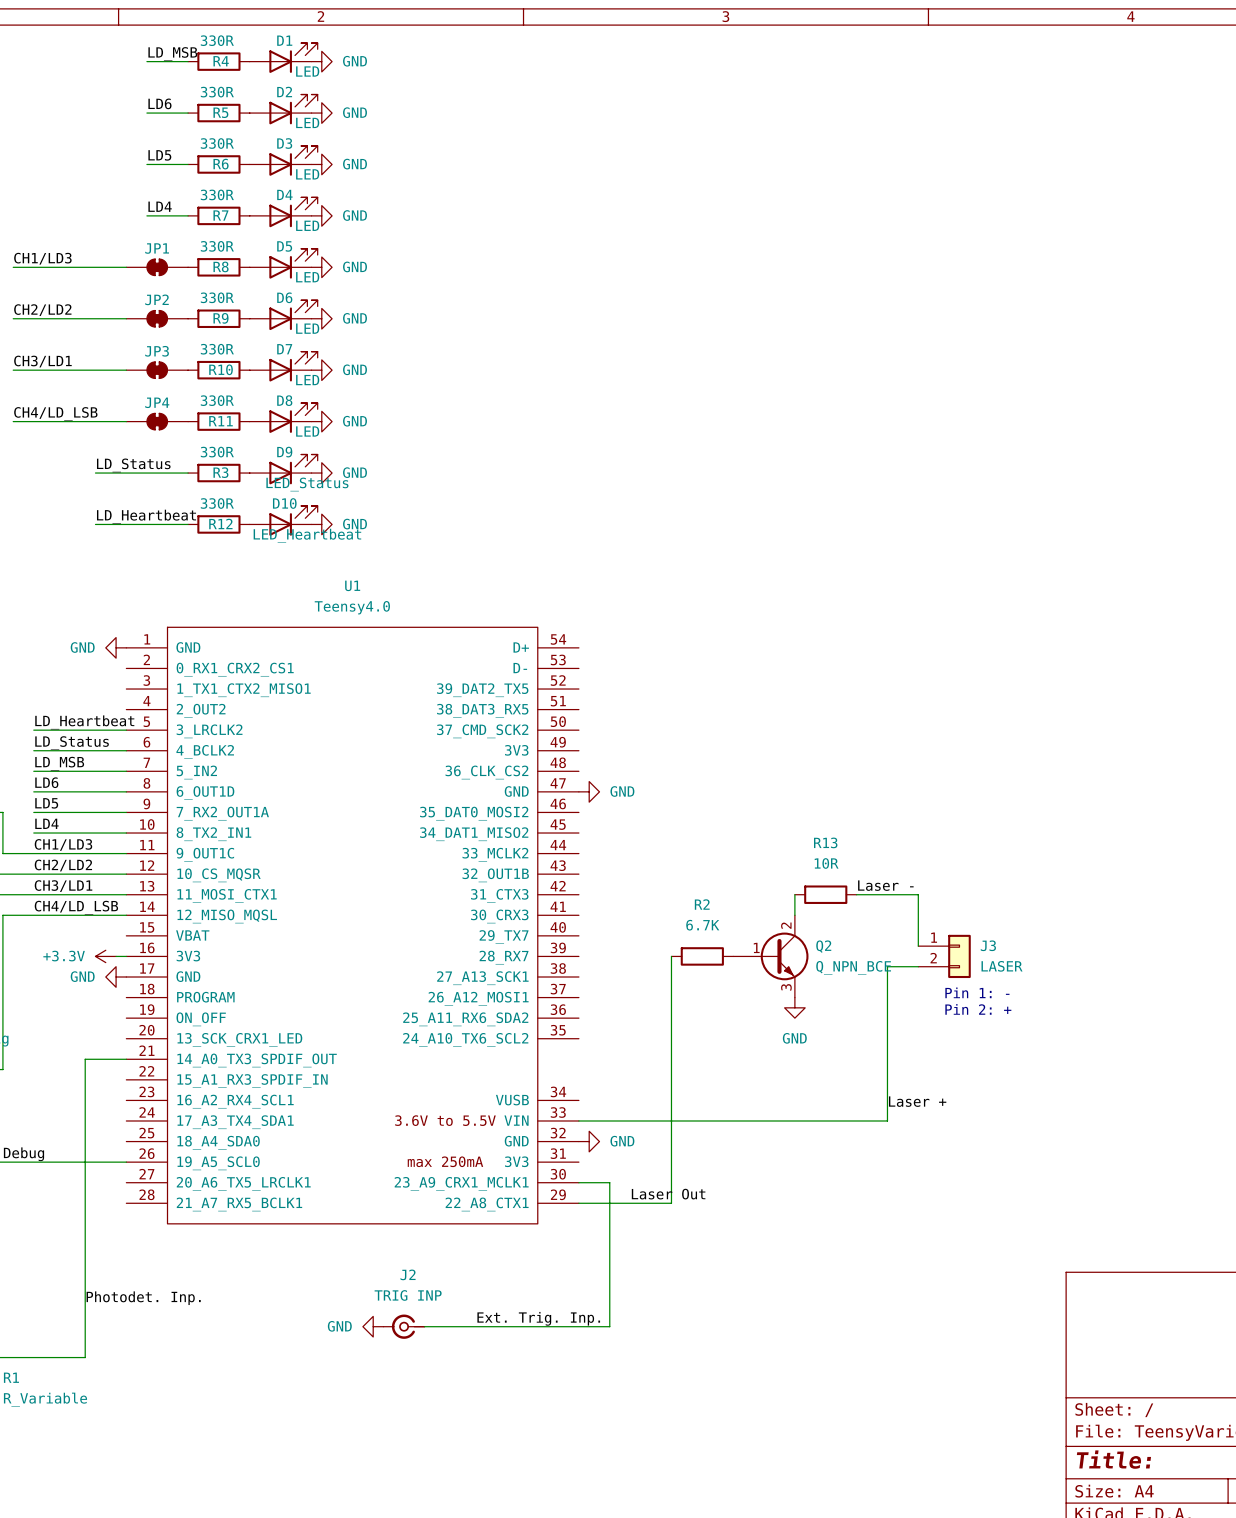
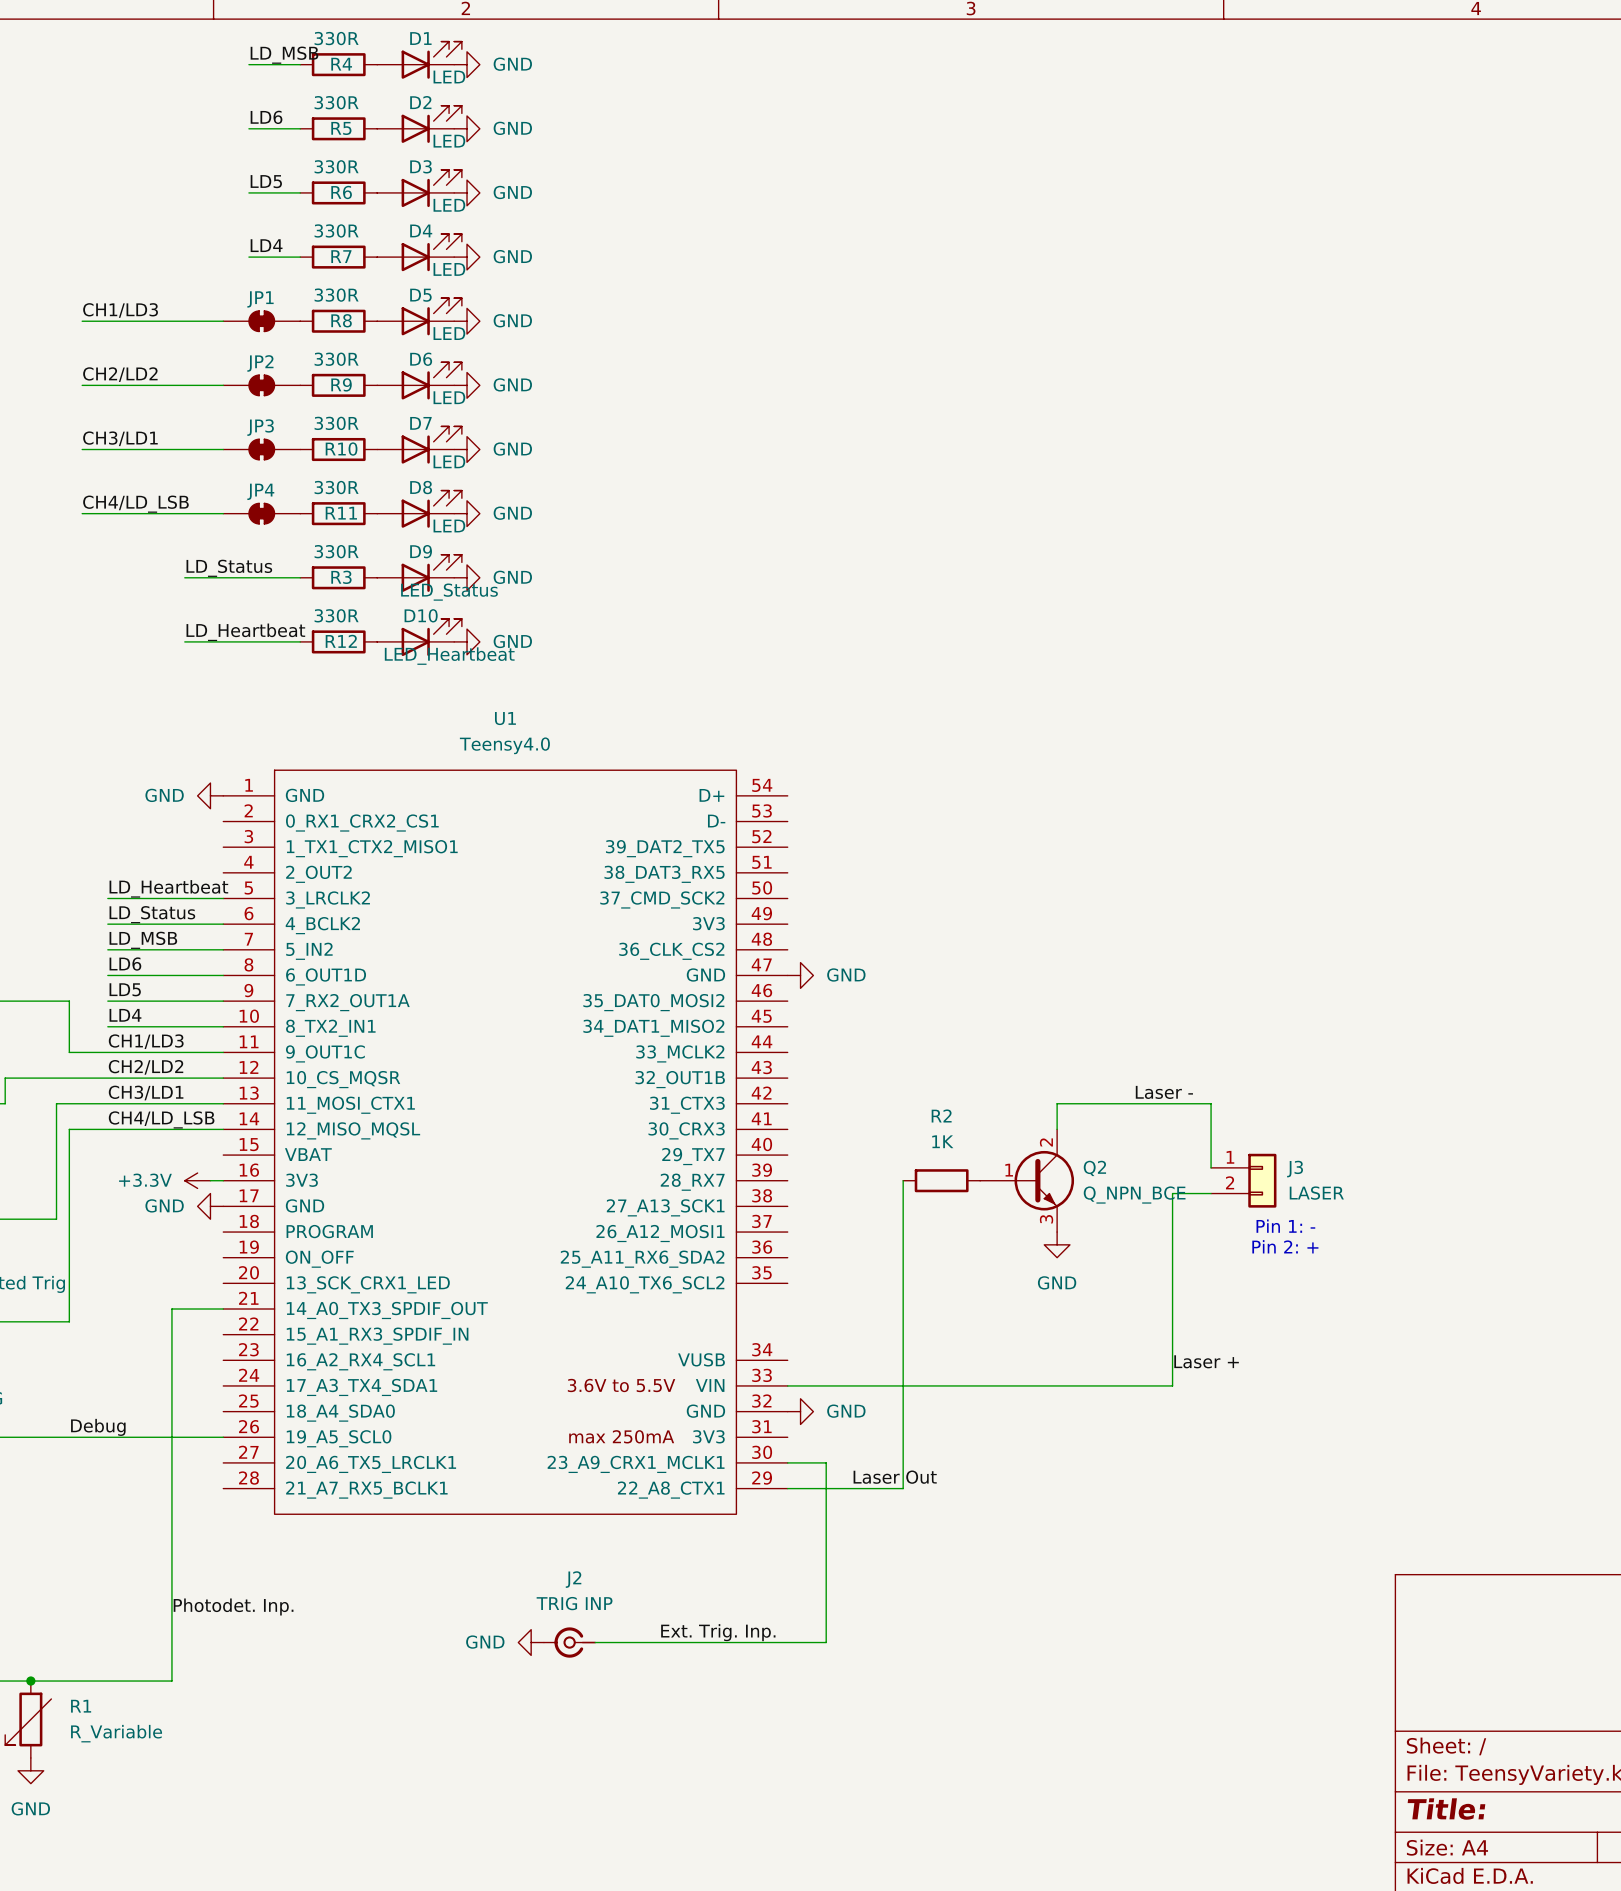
wire: none -> (1057, 1103) (1134, 1103)
R13: 10R (825, 894) -> none
R2 value: 6.7K (702, 925) -> 1K (942, 1141)

